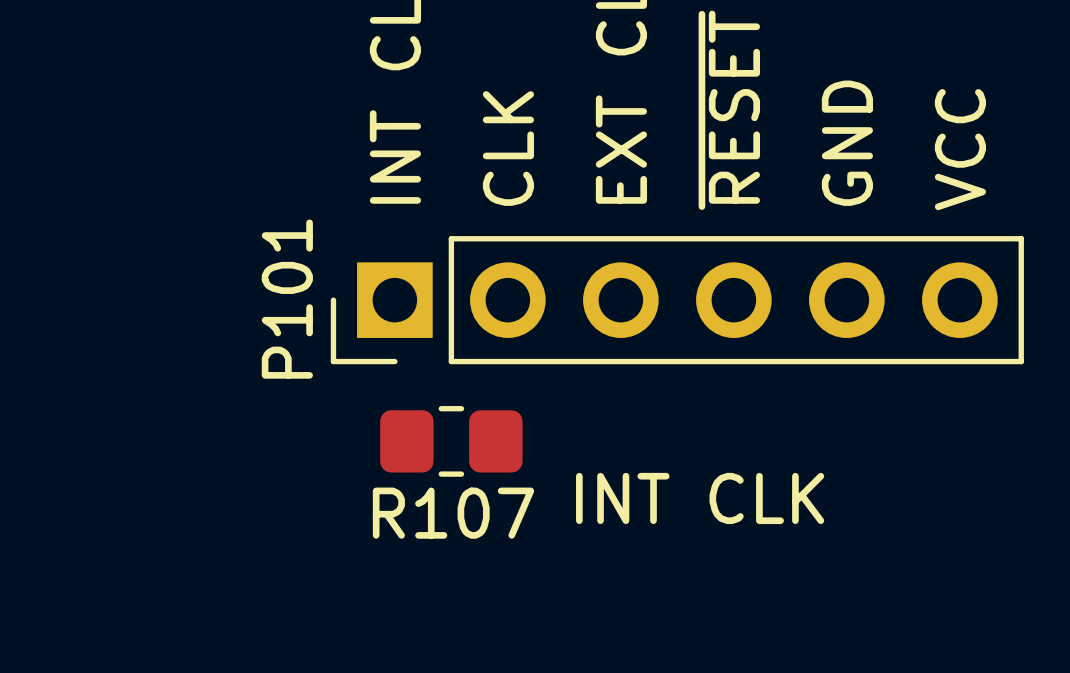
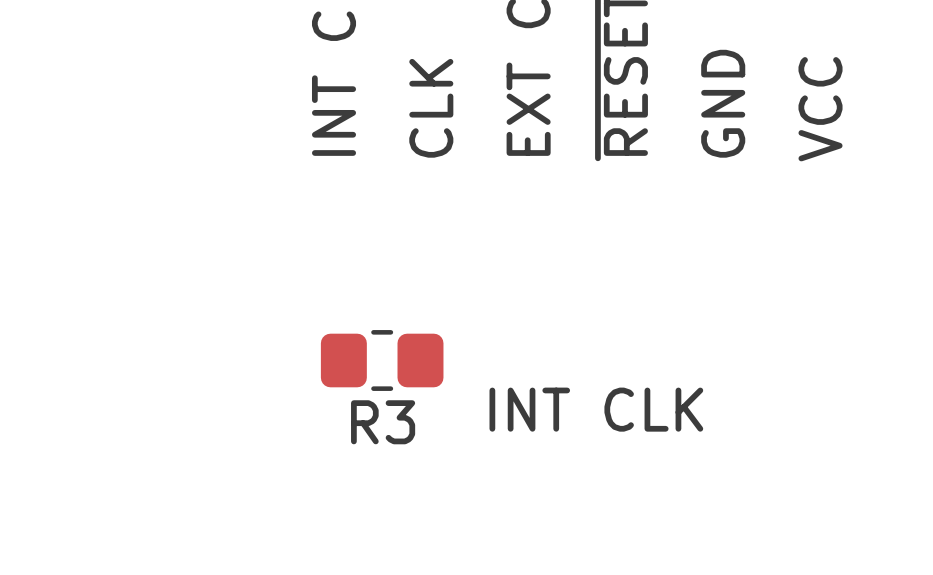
P101: (677, 300) -> none
R107 name: R107 (453, 513) -> R3 (383, 422)

